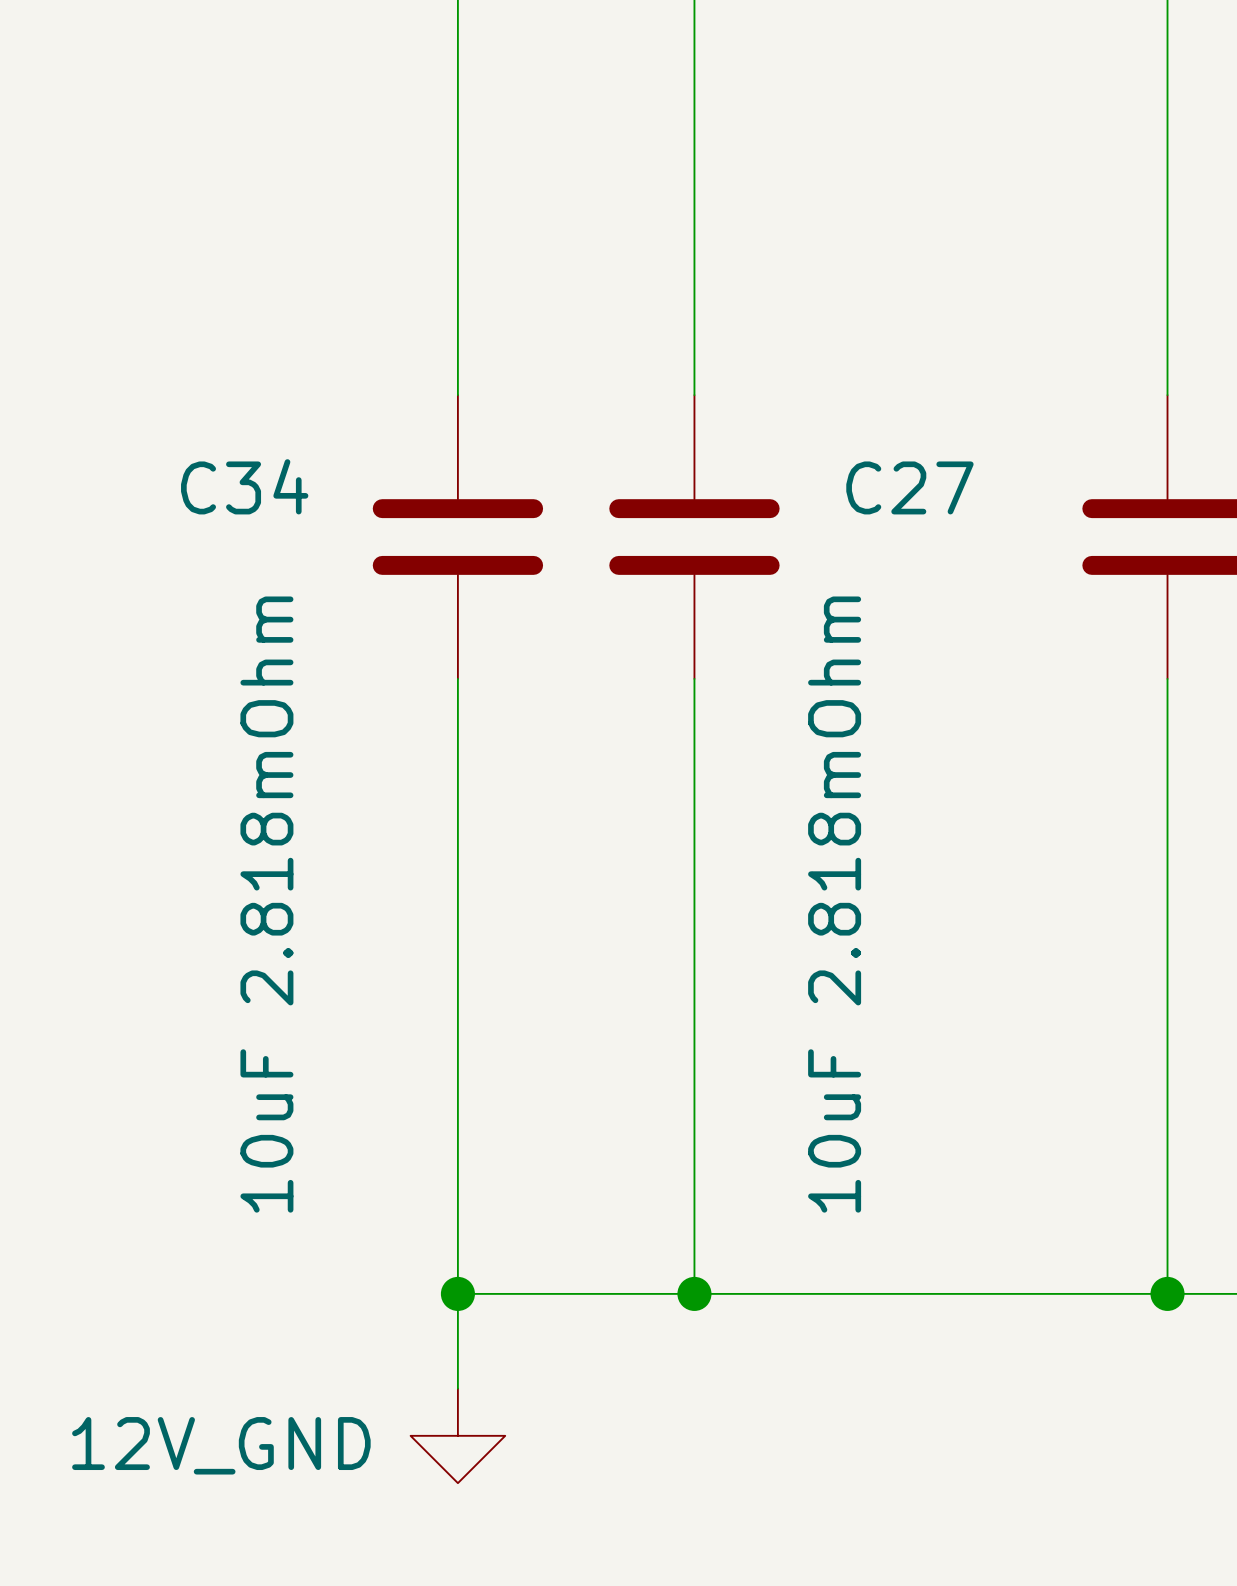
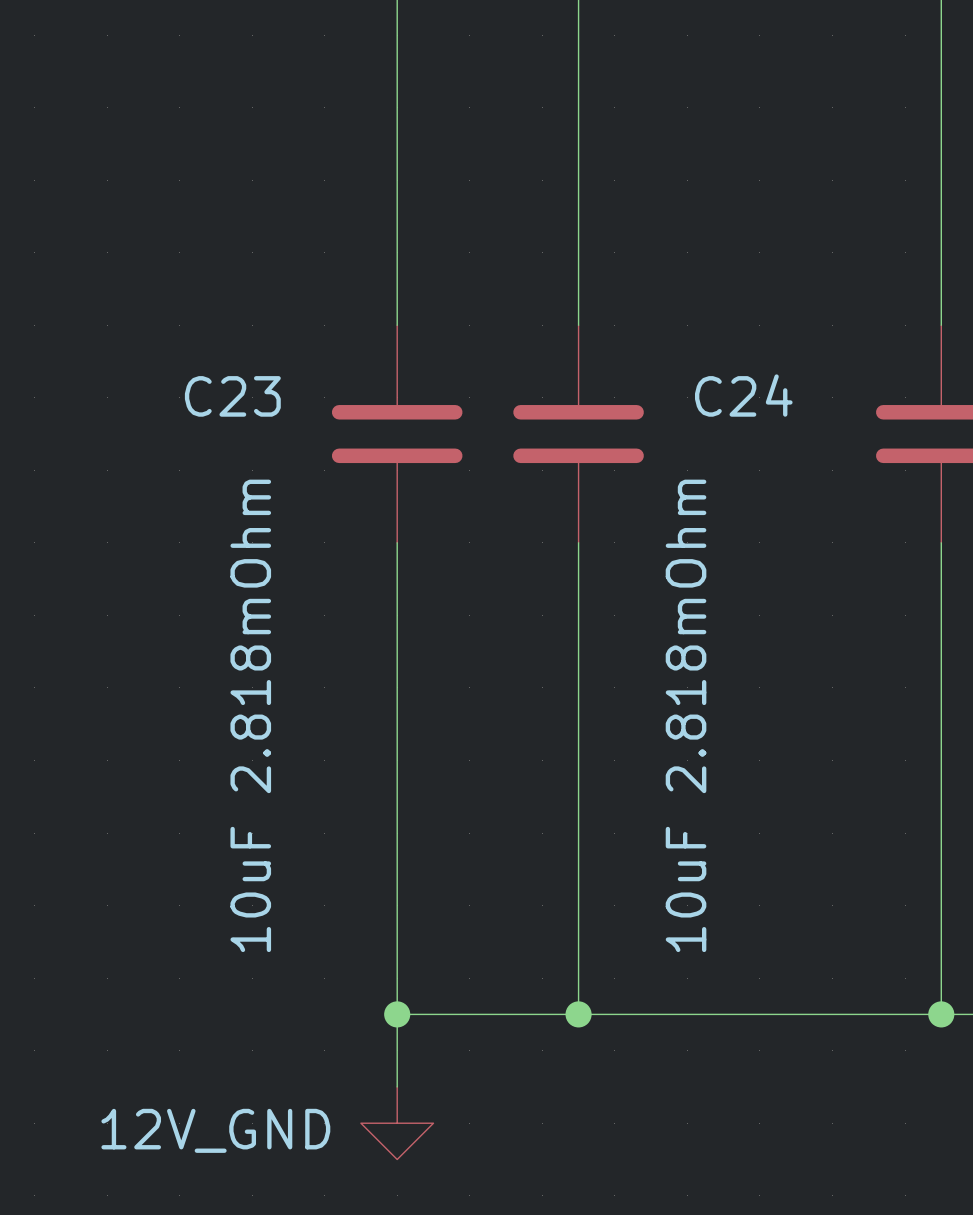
C34 name: C34 (244, 486) -> C23 (232, 396)
C27 name: C27 (909, 487) -> C24 (743, 395)

